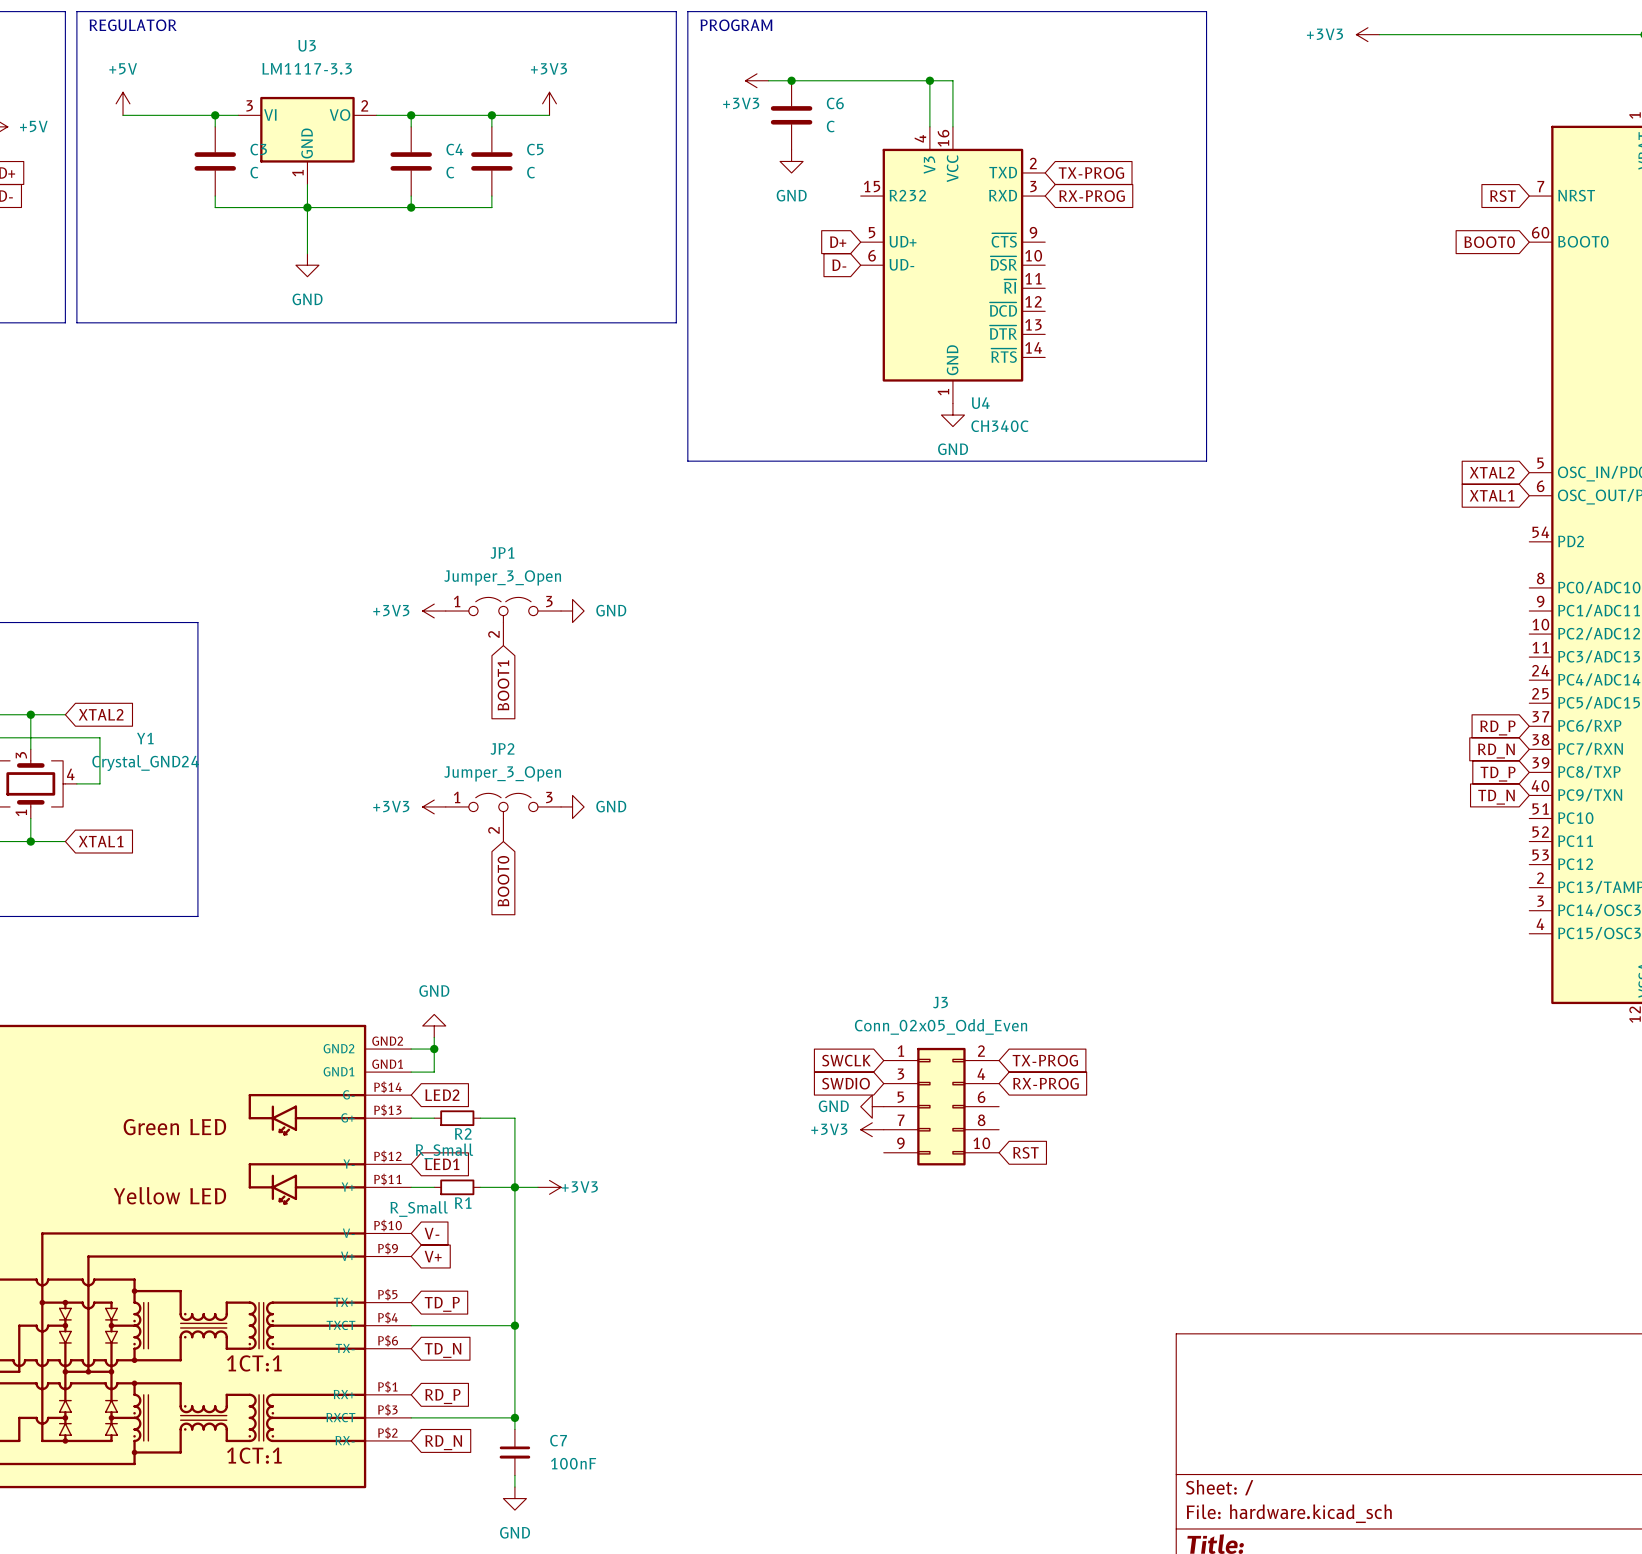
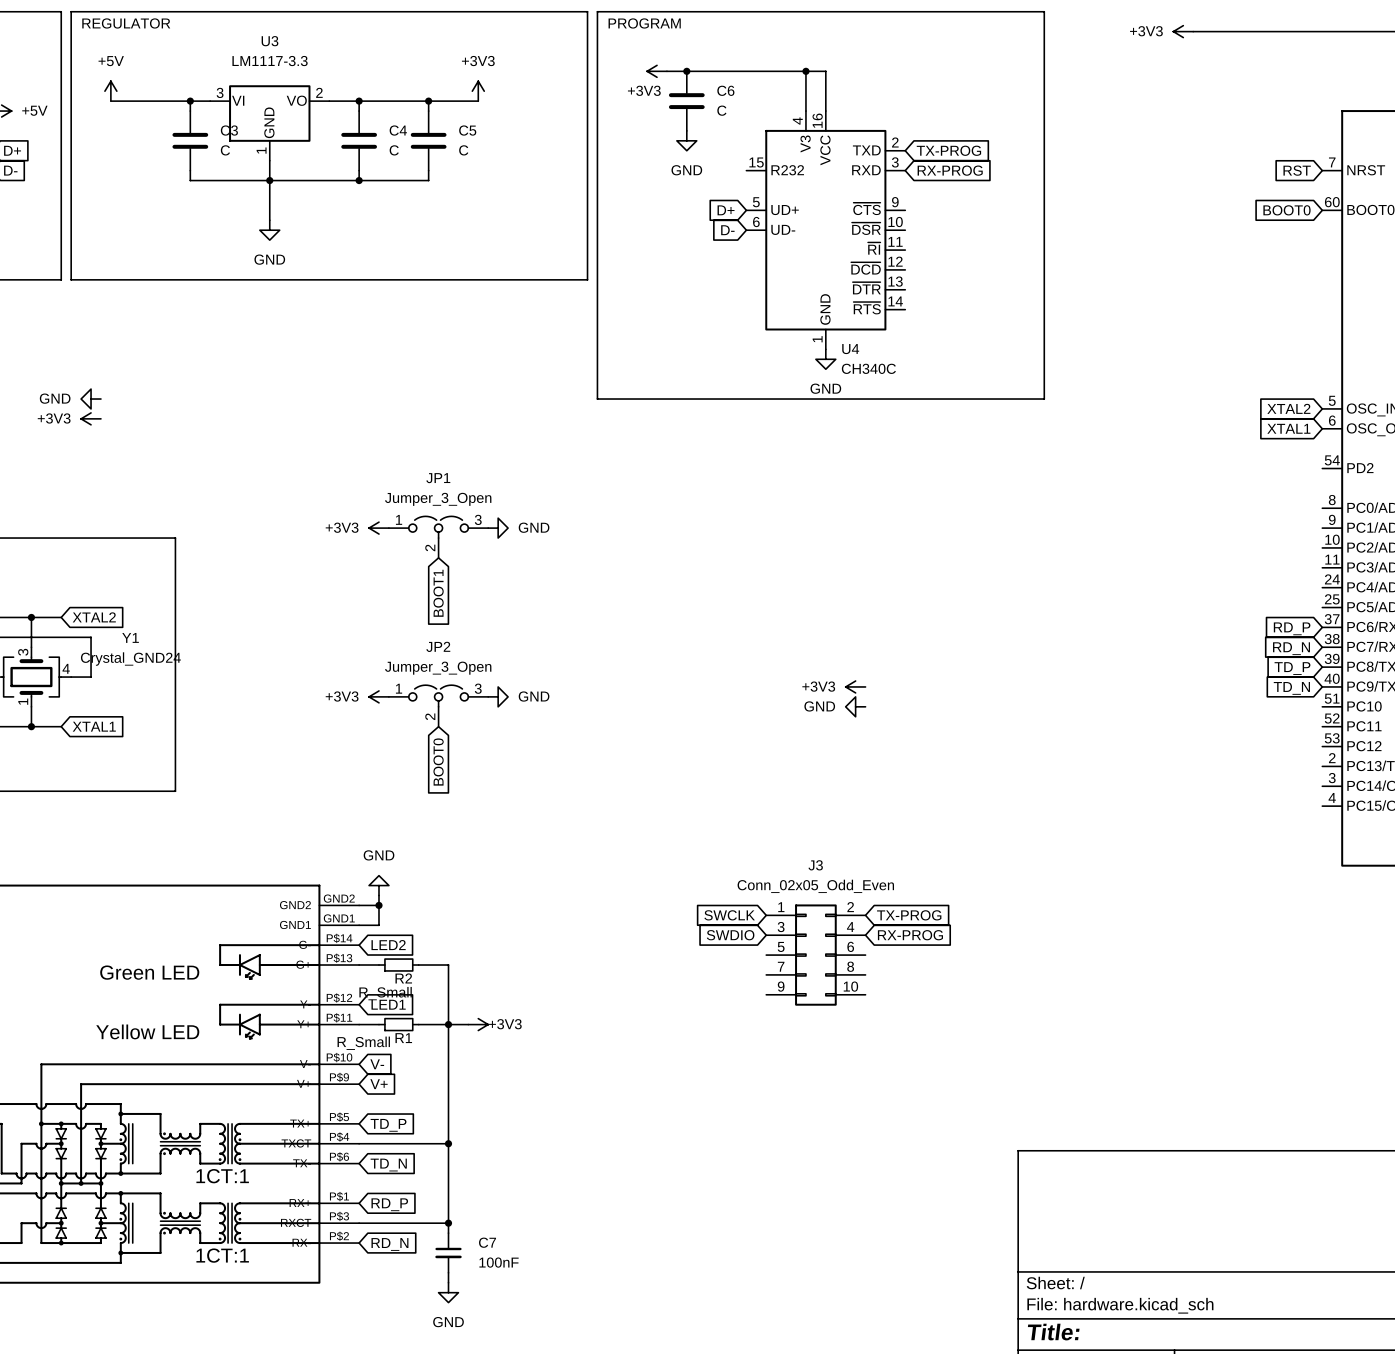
power symbol: none -> GND (91, 399)
power symbol: none -> +3V3 (91, 418)
power symbol: none -> +3V3 (855, 686)
power symbol: none -> GND (855, 706)
power symbol: GND (872, 1106) -> none
power symbol: +3V3 (872, 1129) -> none
global label: RST (1025, 1152) -> none

